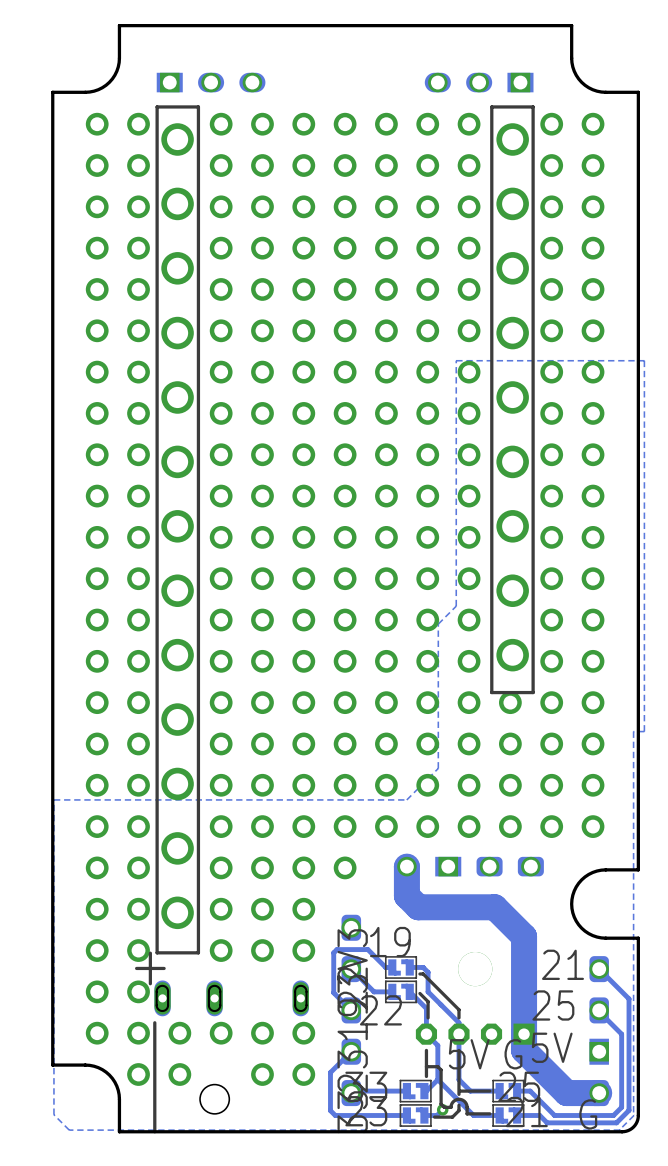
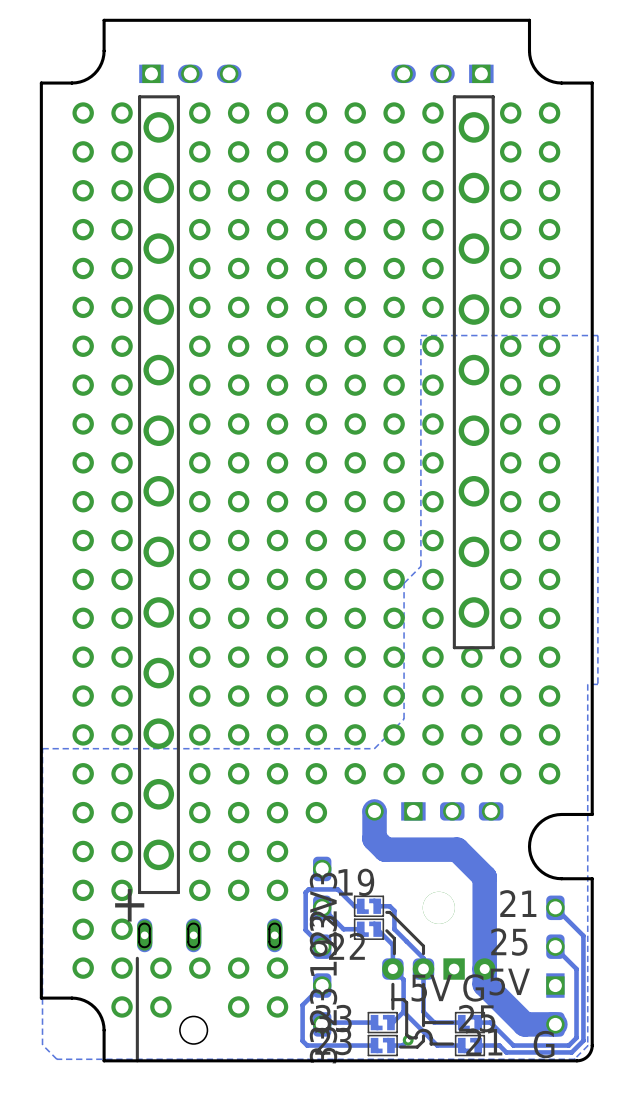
part footprint: [415, 1023, 535, 1045] -> [382, 958, 496, 980]

